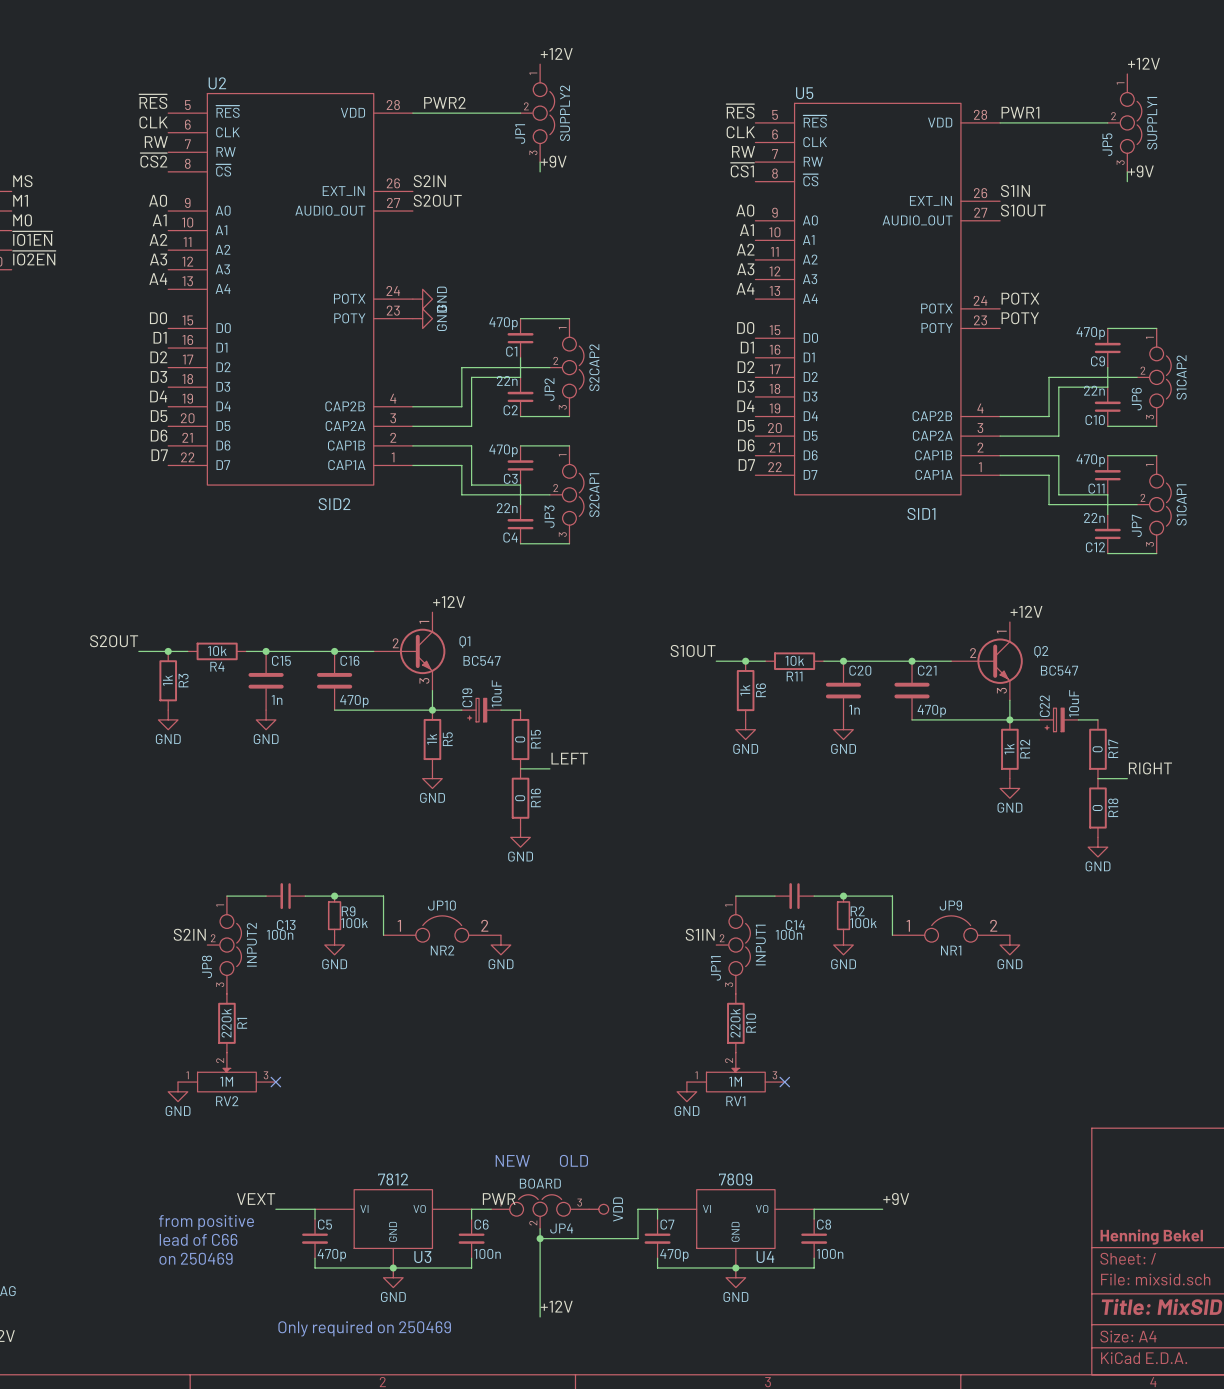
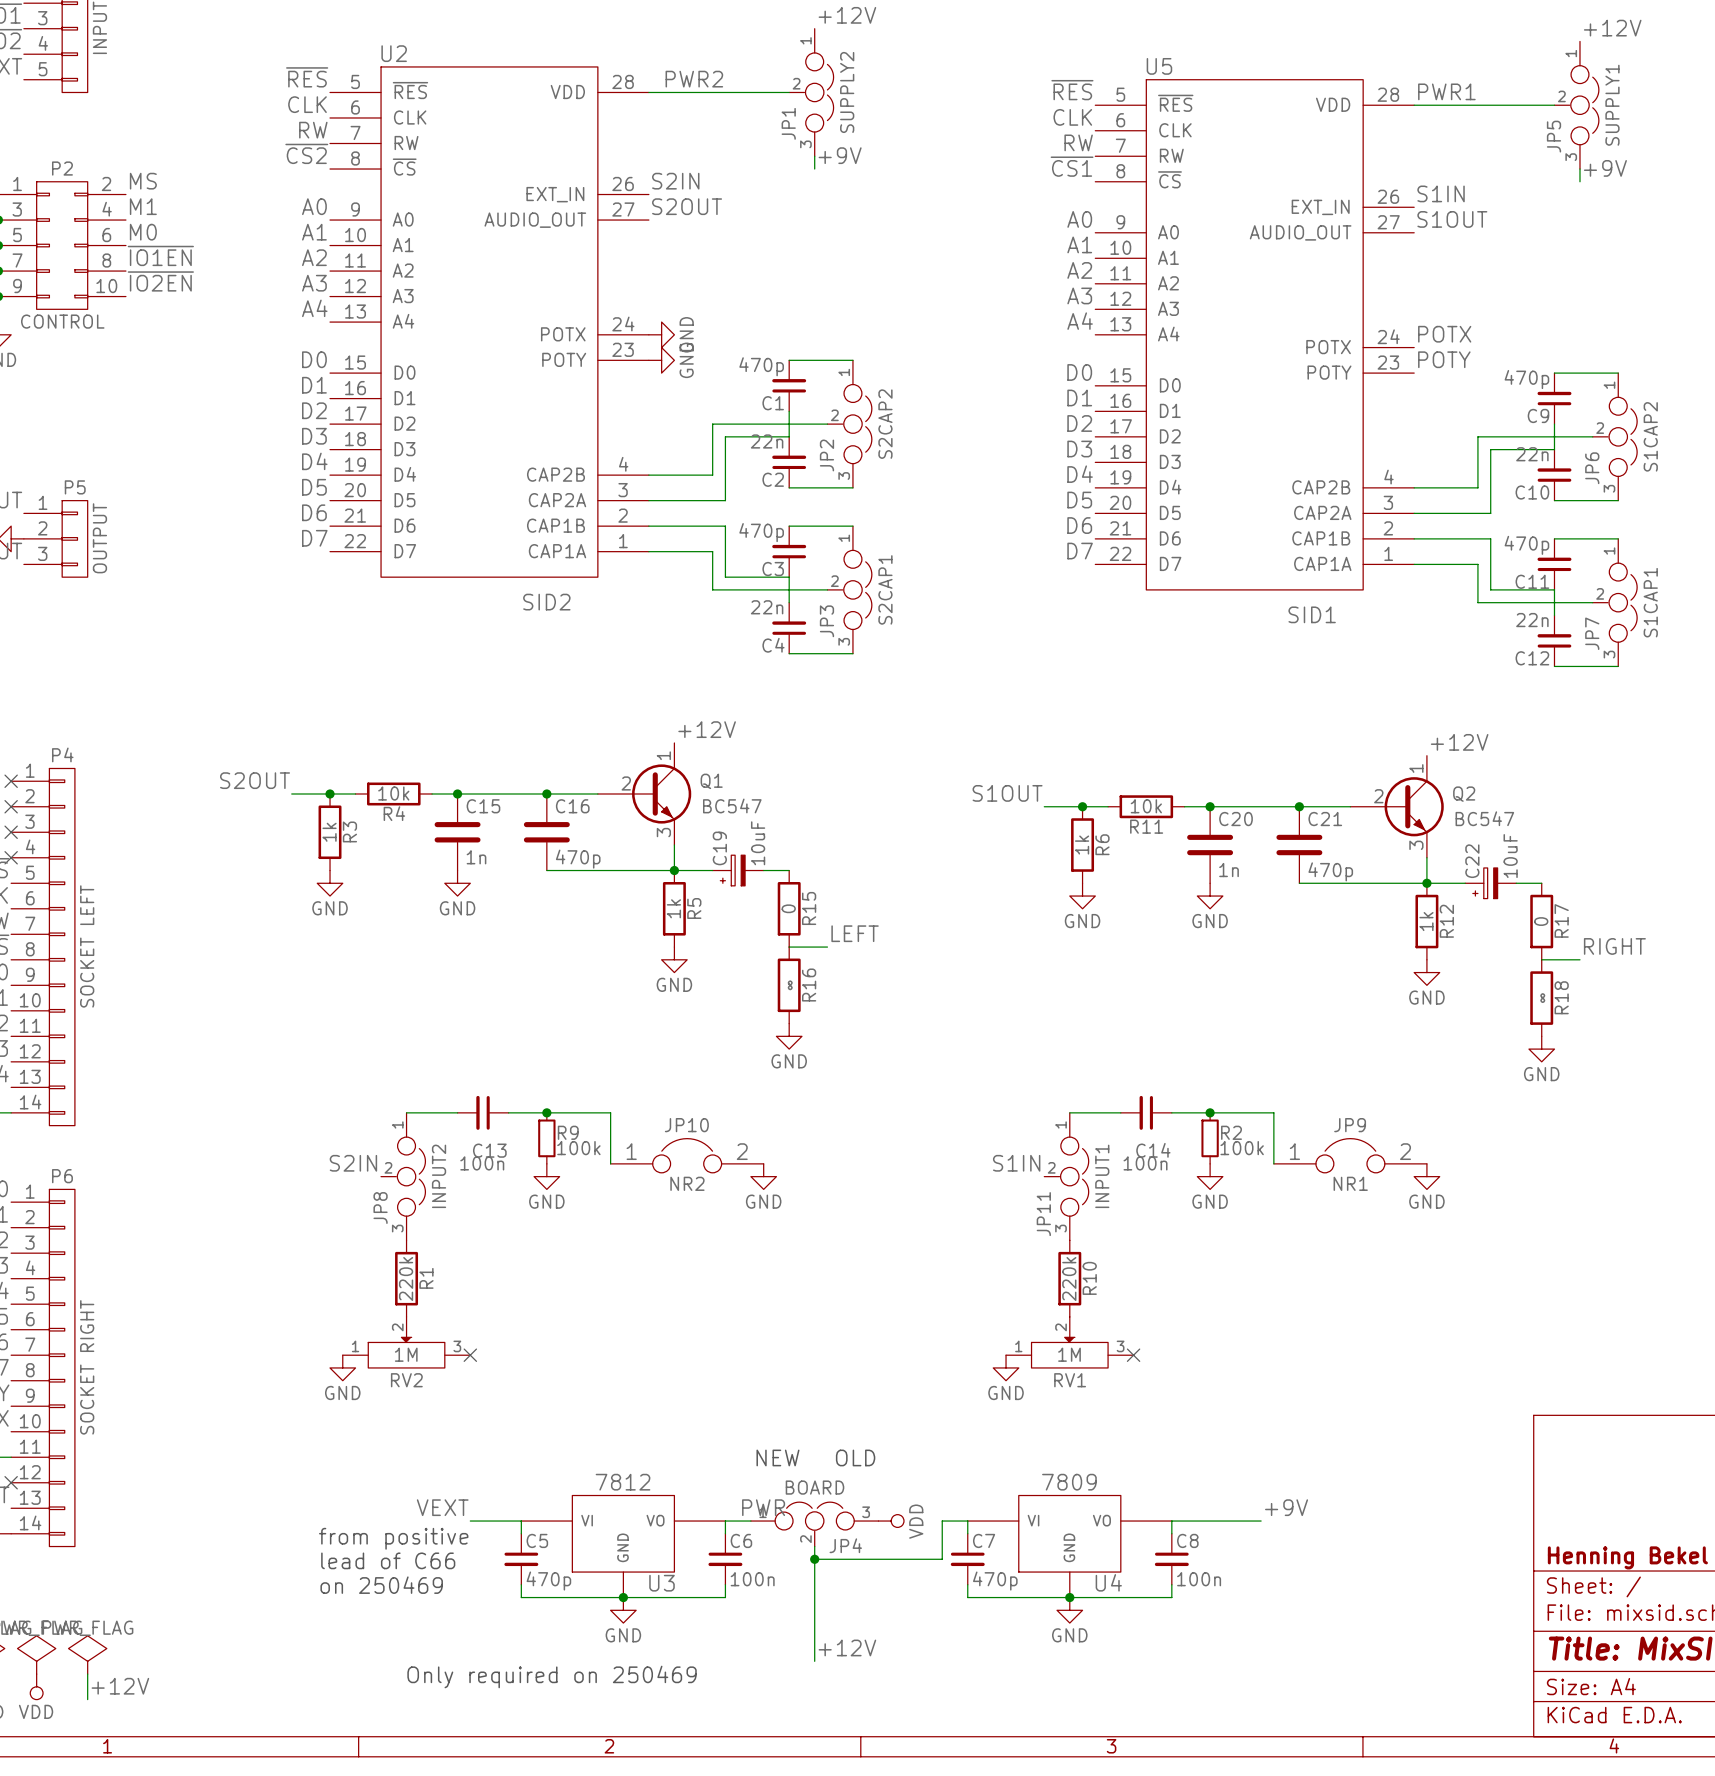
R16 value: 0 (520, 798) -> ∞ (790, 985)
R18 value: 0 (1097, 808) -> ∞ (1542, 998)

